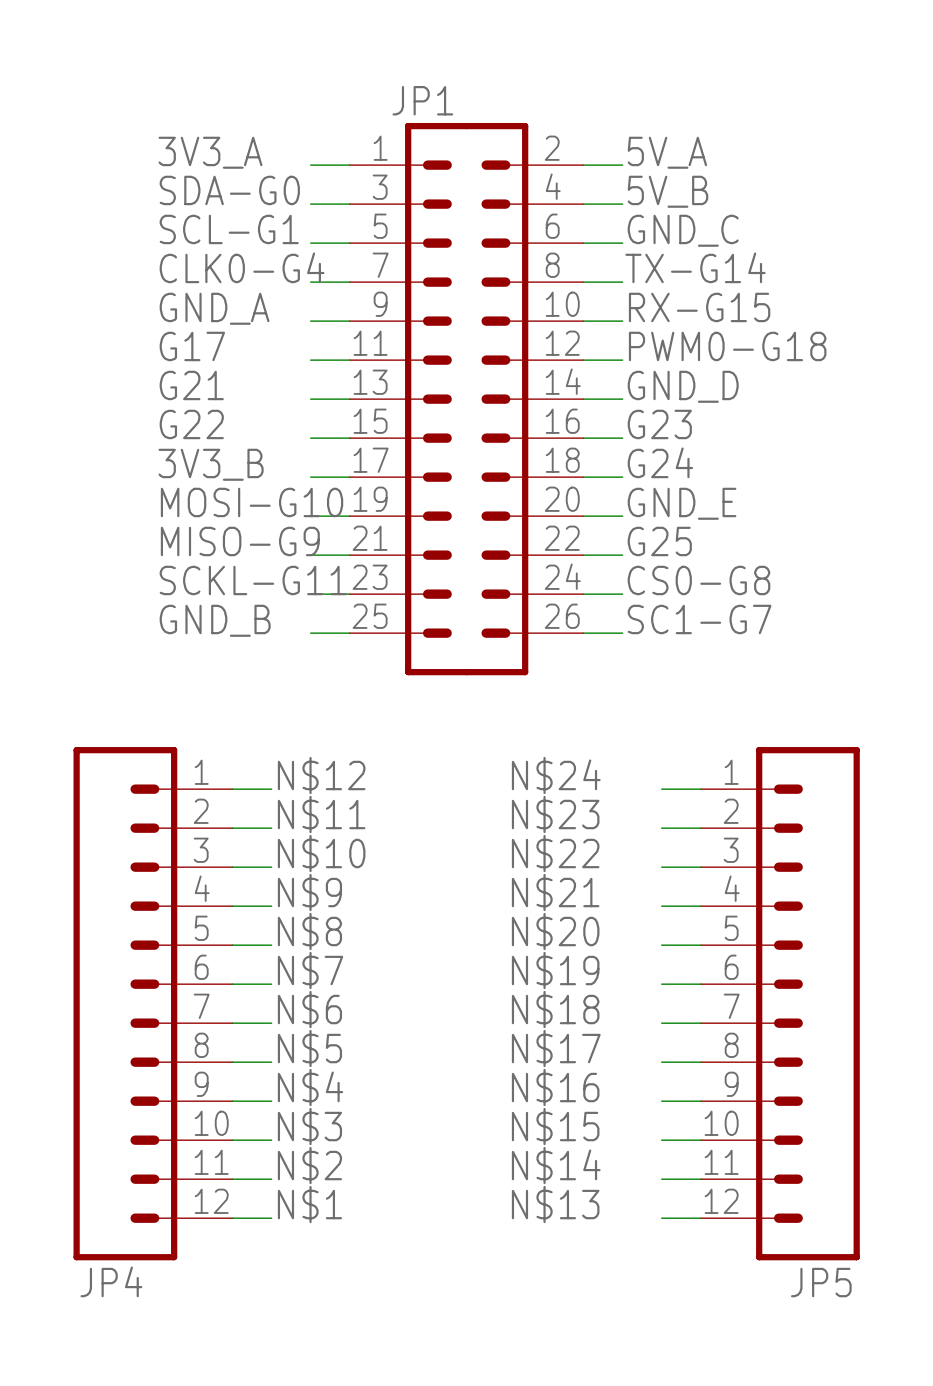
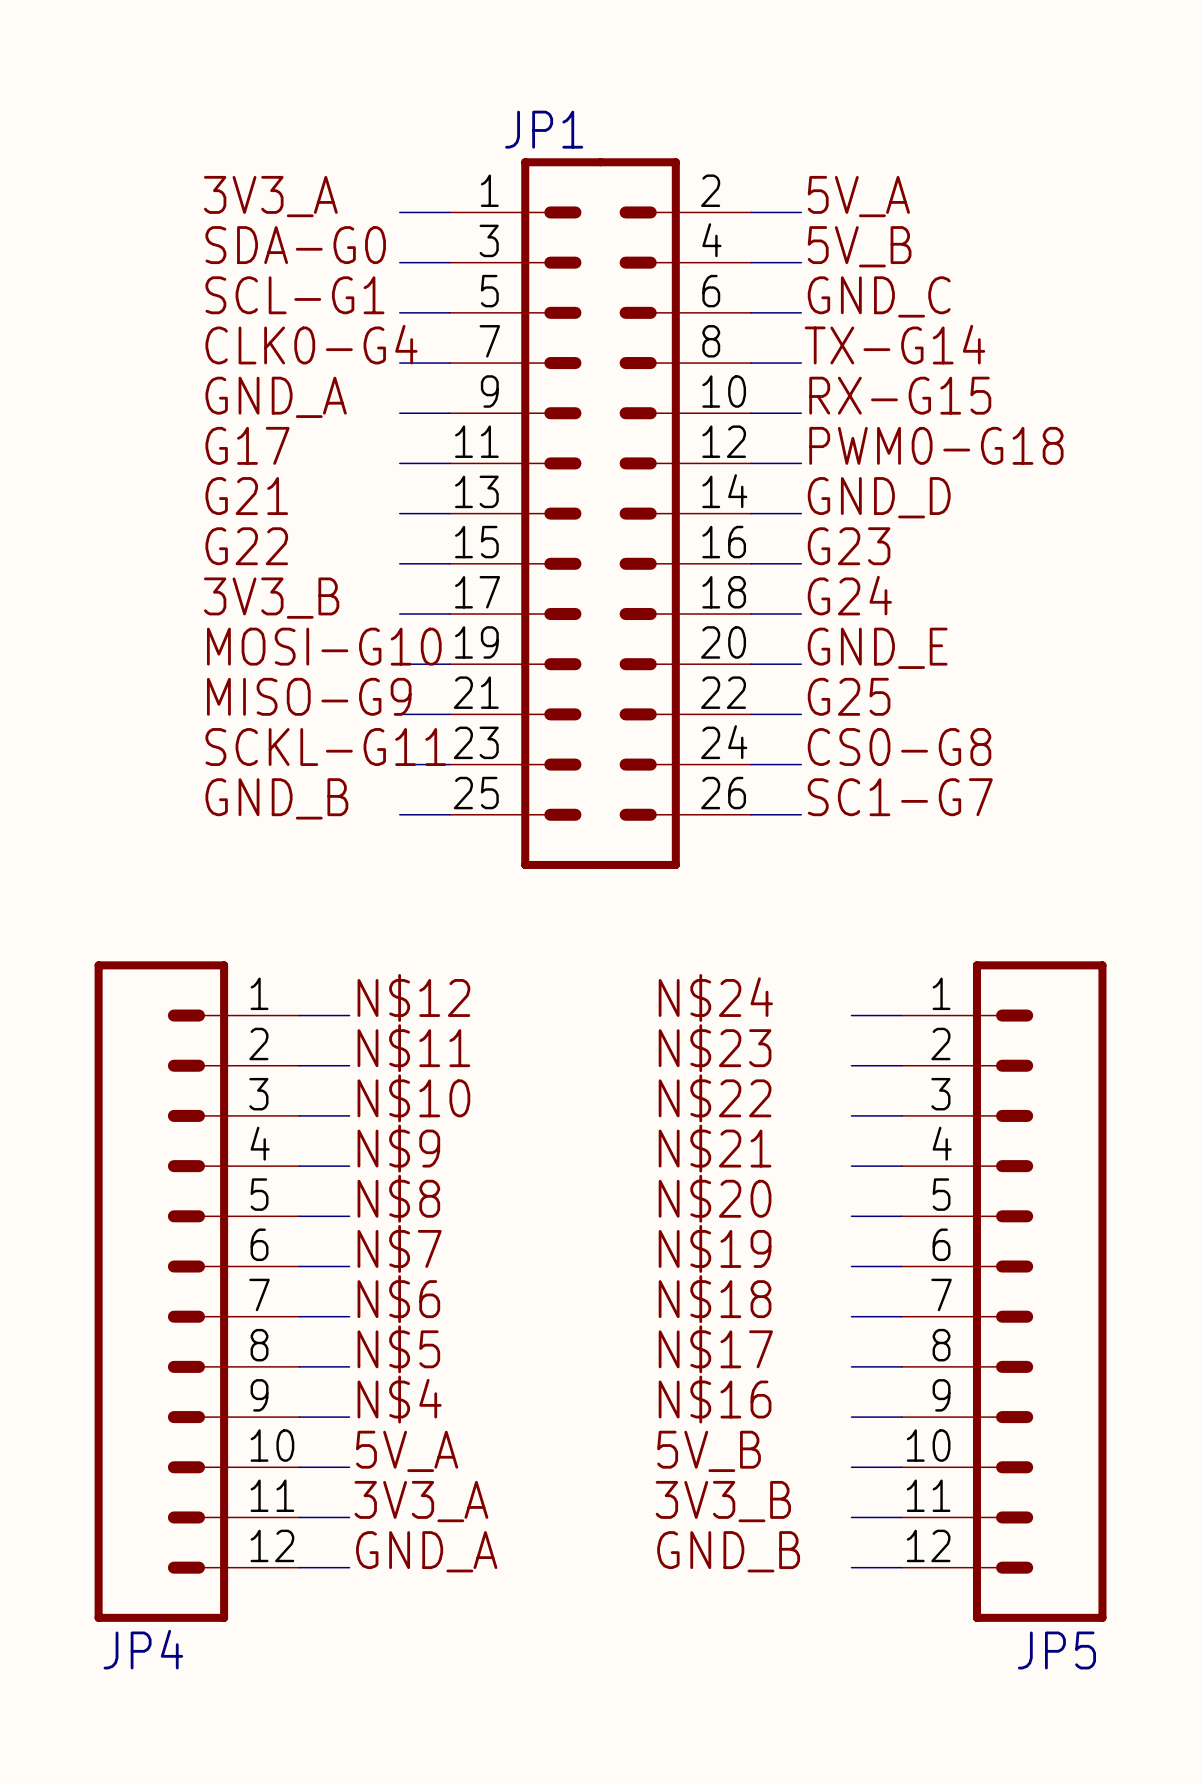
label: N$3 (309, 1126) -> 5V_A (407, 1451)
label: N$15 (555, 1126) -> 5V_B (709, 1451)
label: N$2 (309, 1165) -> 3V3_A (421, 1501)
label: N$14 (556, 1165) -> 3V3_B (723, 1501)
label: N$1 (309, 1204) -> GND_A (426, 1551)
label: N$13 (555, 1204) -> GND_B (728, 1551)

